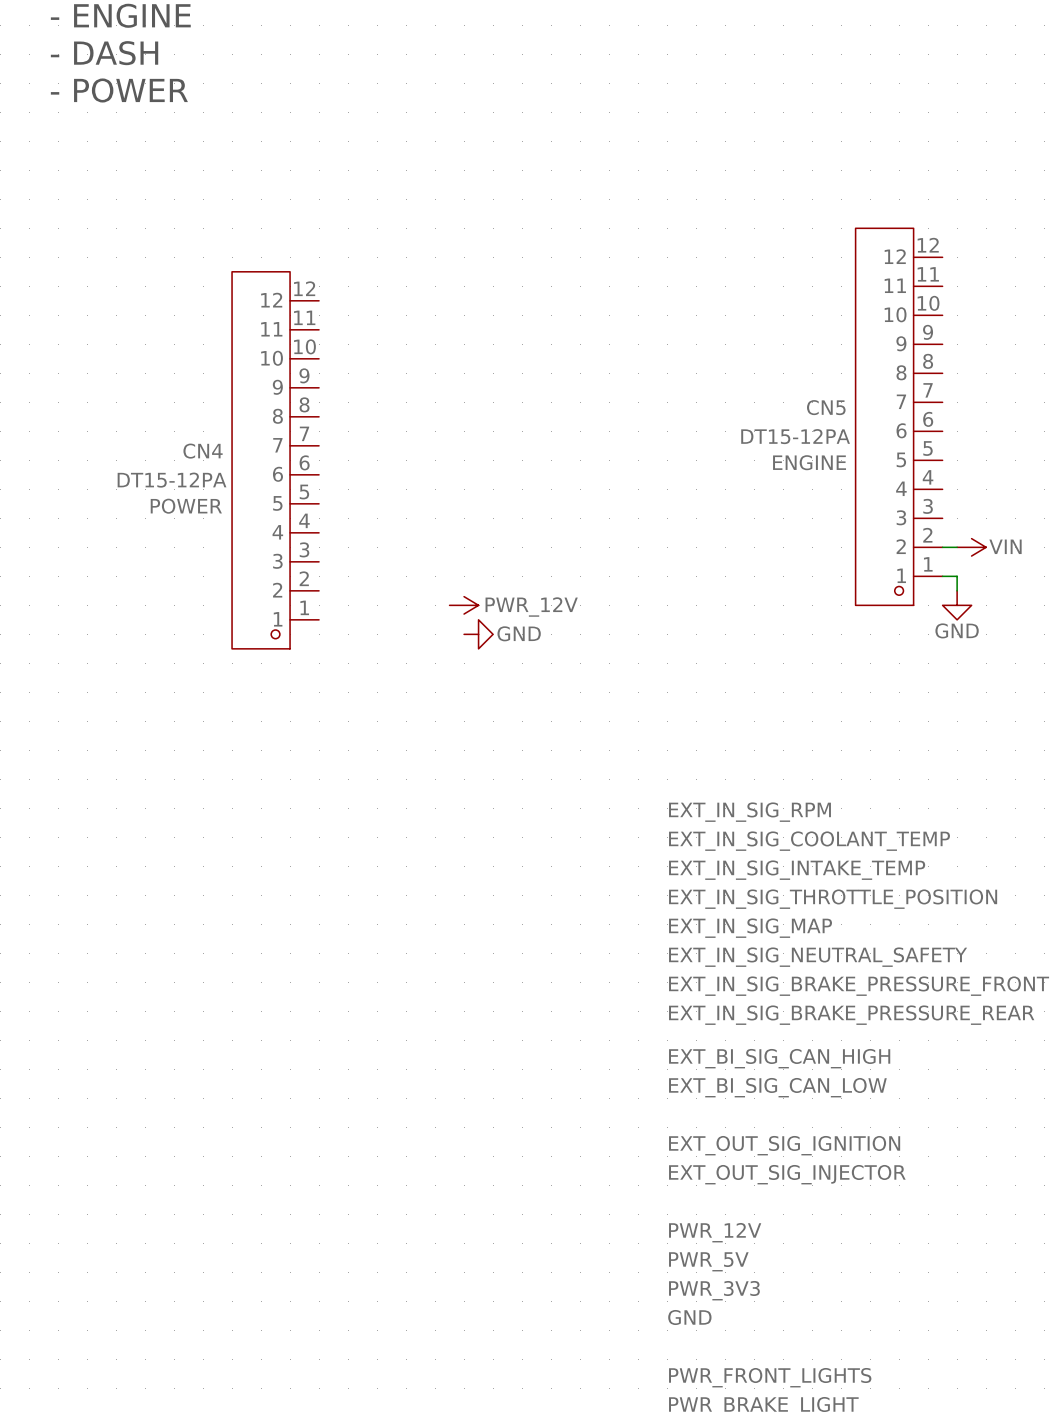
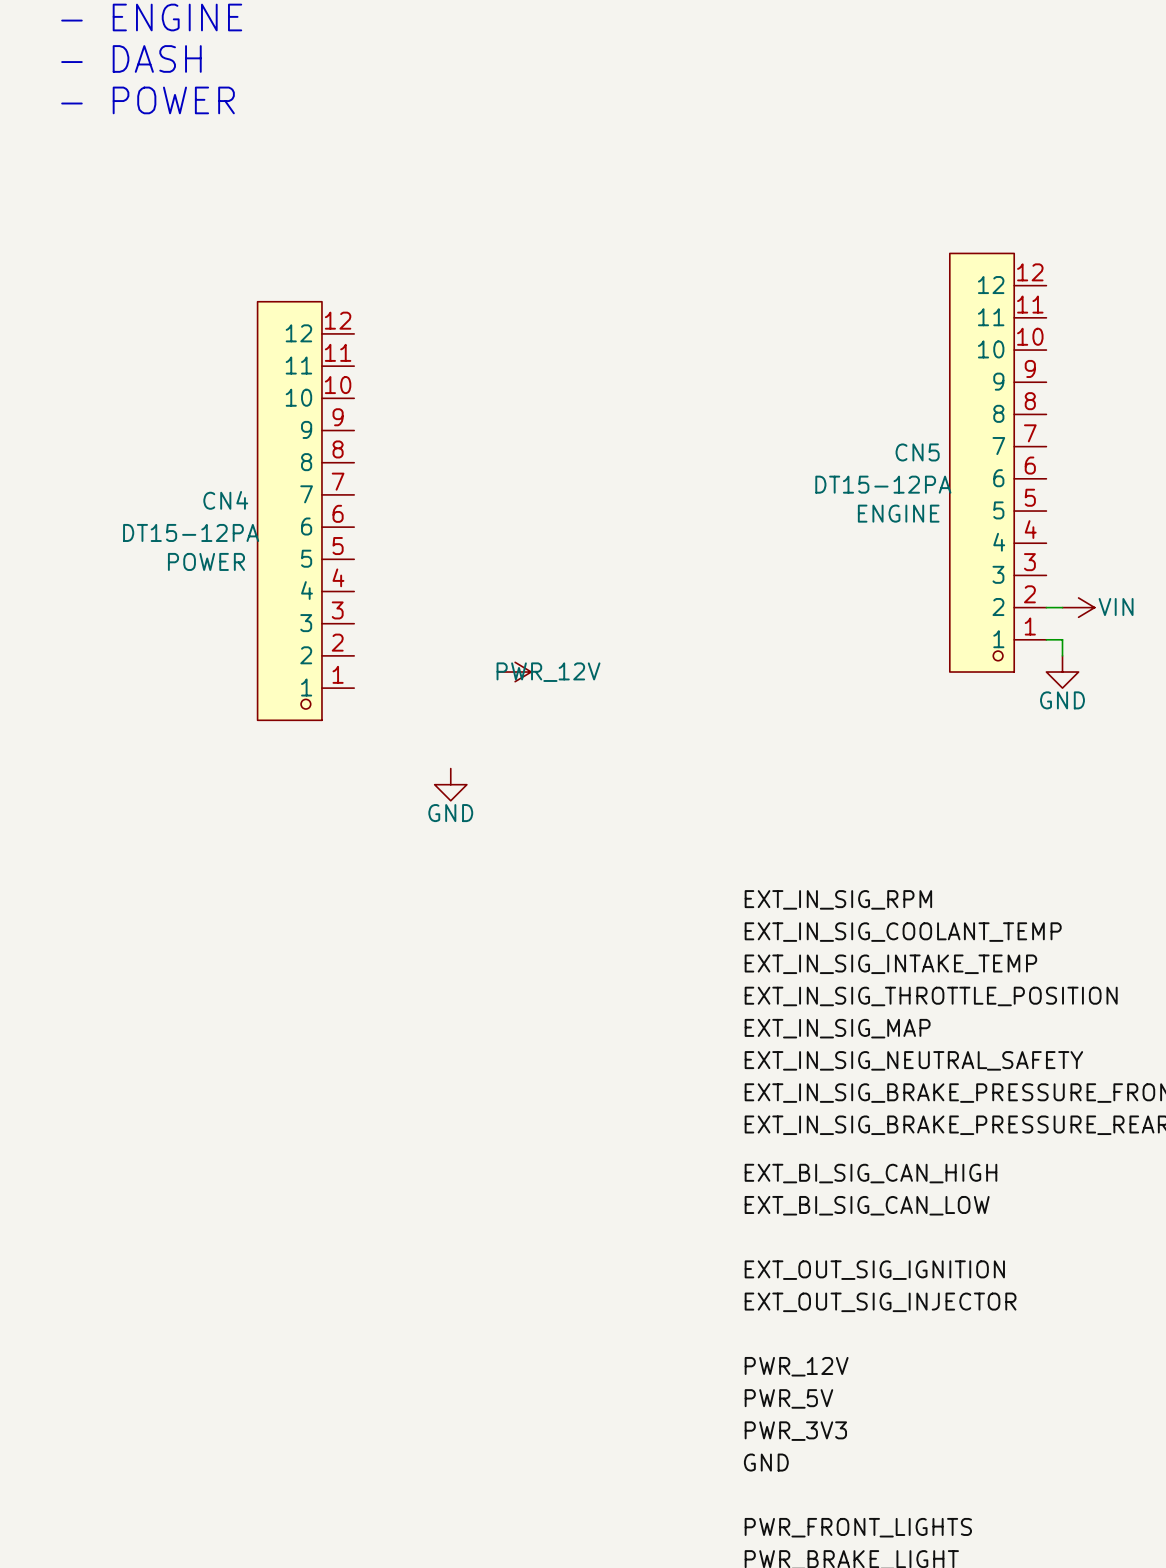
power symbol text position: PWR_12V (531, 607) -> PWR_12V (548, 672)
power symbol rotation: 0° (478, 634) -> 90° clockwise (450, 784)
power symbol position: GND (478, 634) -> GND (450, 784)

